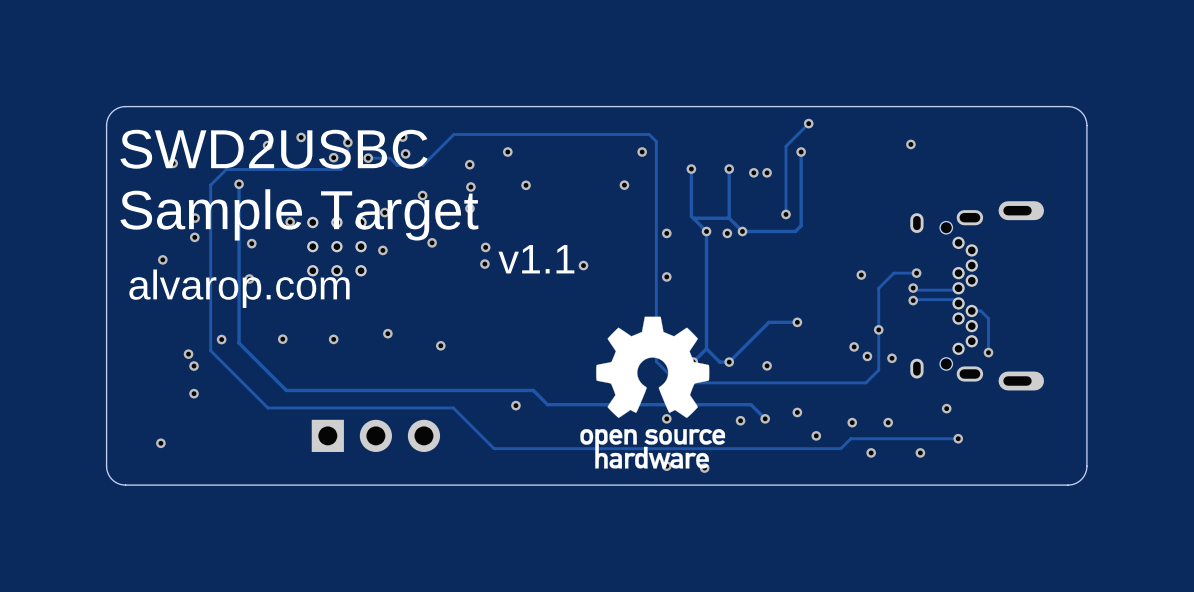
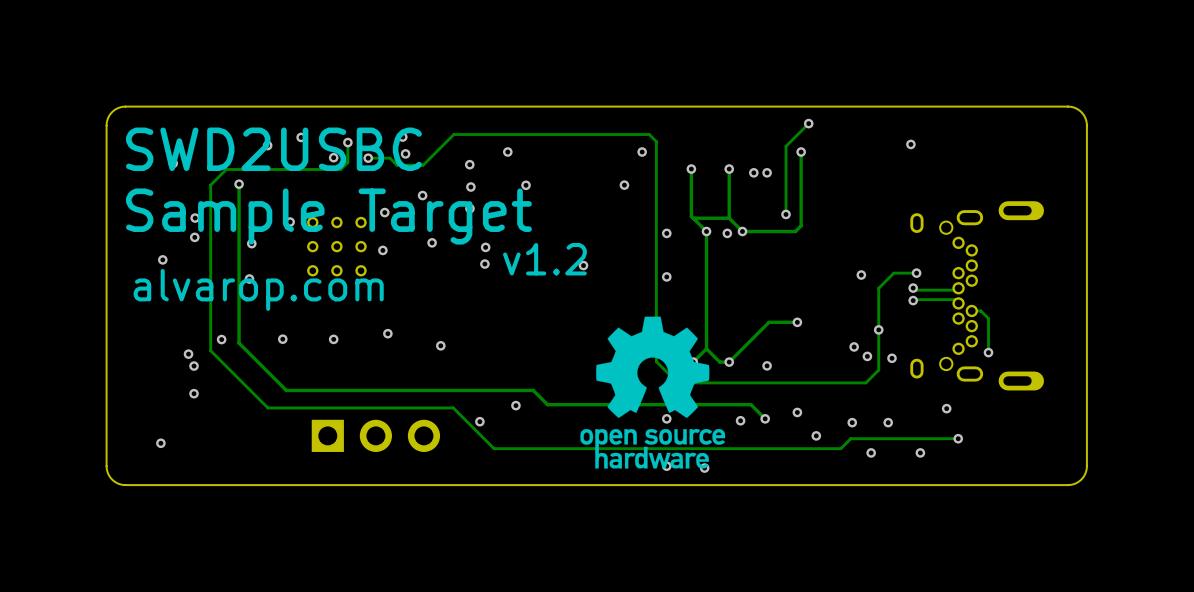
text: v1.1 (536, 259) -> v1.2 (544, 259)
via: none -> (479, 421)

